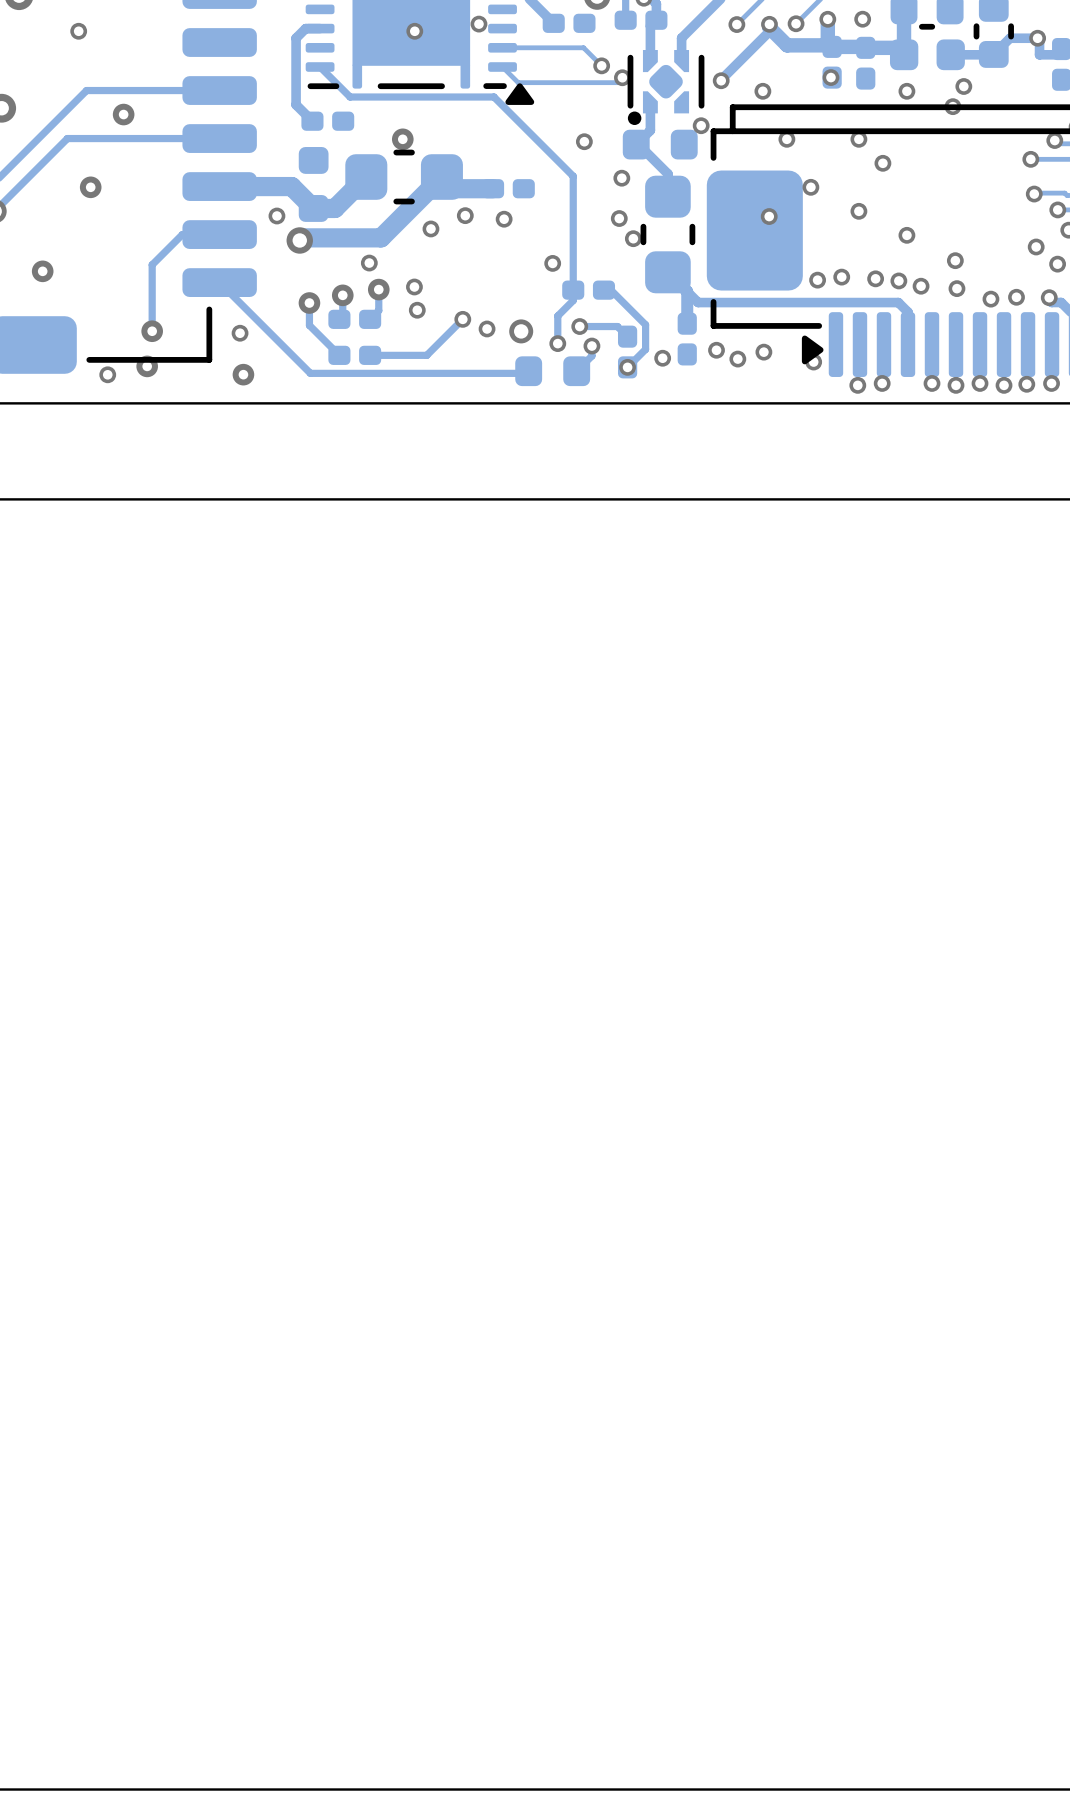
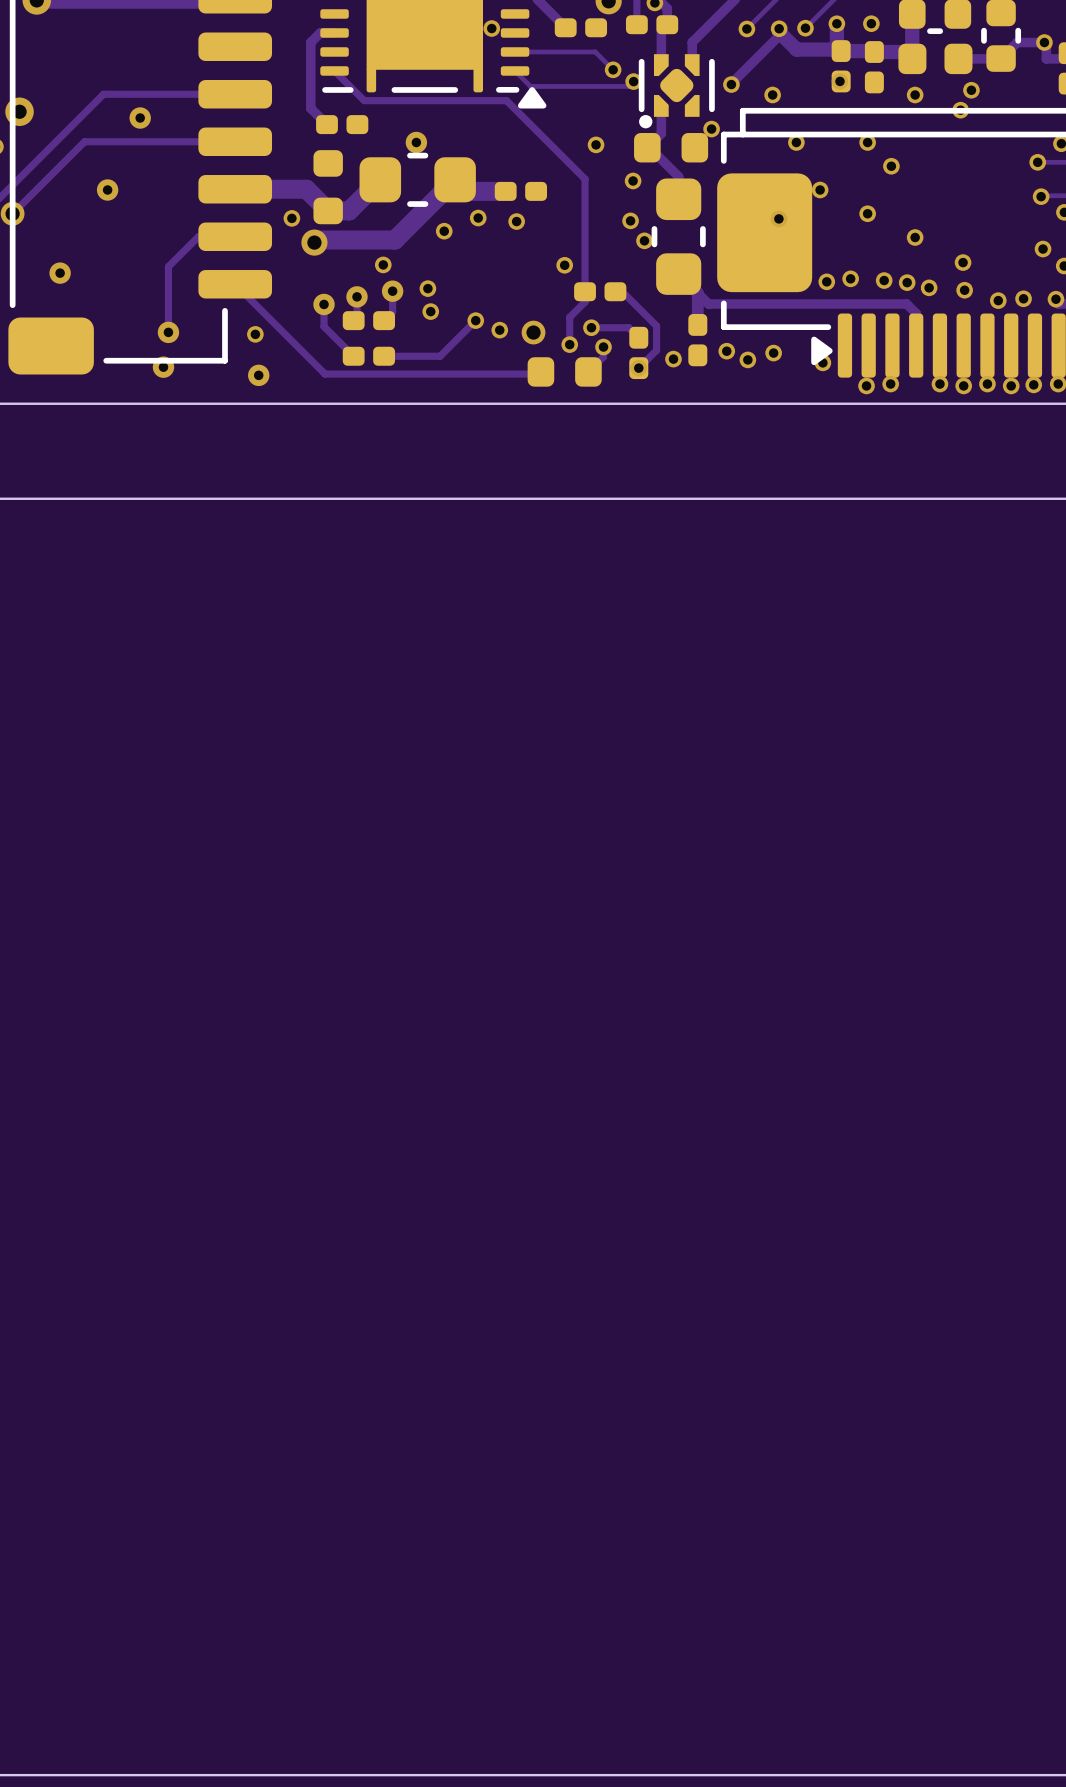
via: (78, 31) -> none
via: (414, 31) -> none
via: (107, 374) -> none

